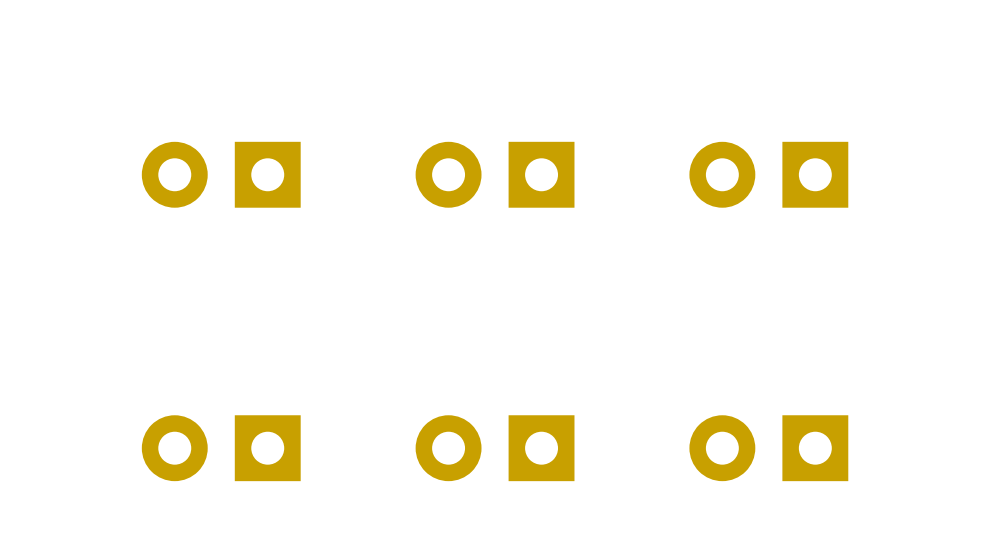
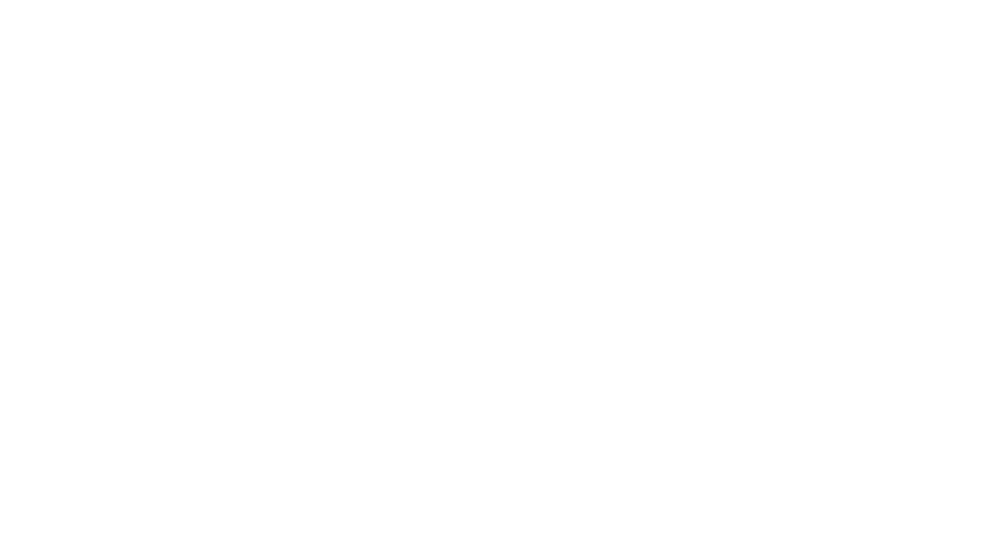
part: (221, 174) -> none
part: (495, 174) -> none
part: (768, 174) -> none
part: (221, 448) -> none
part: (495, 448) -> none
part: (768, 448) -> none

